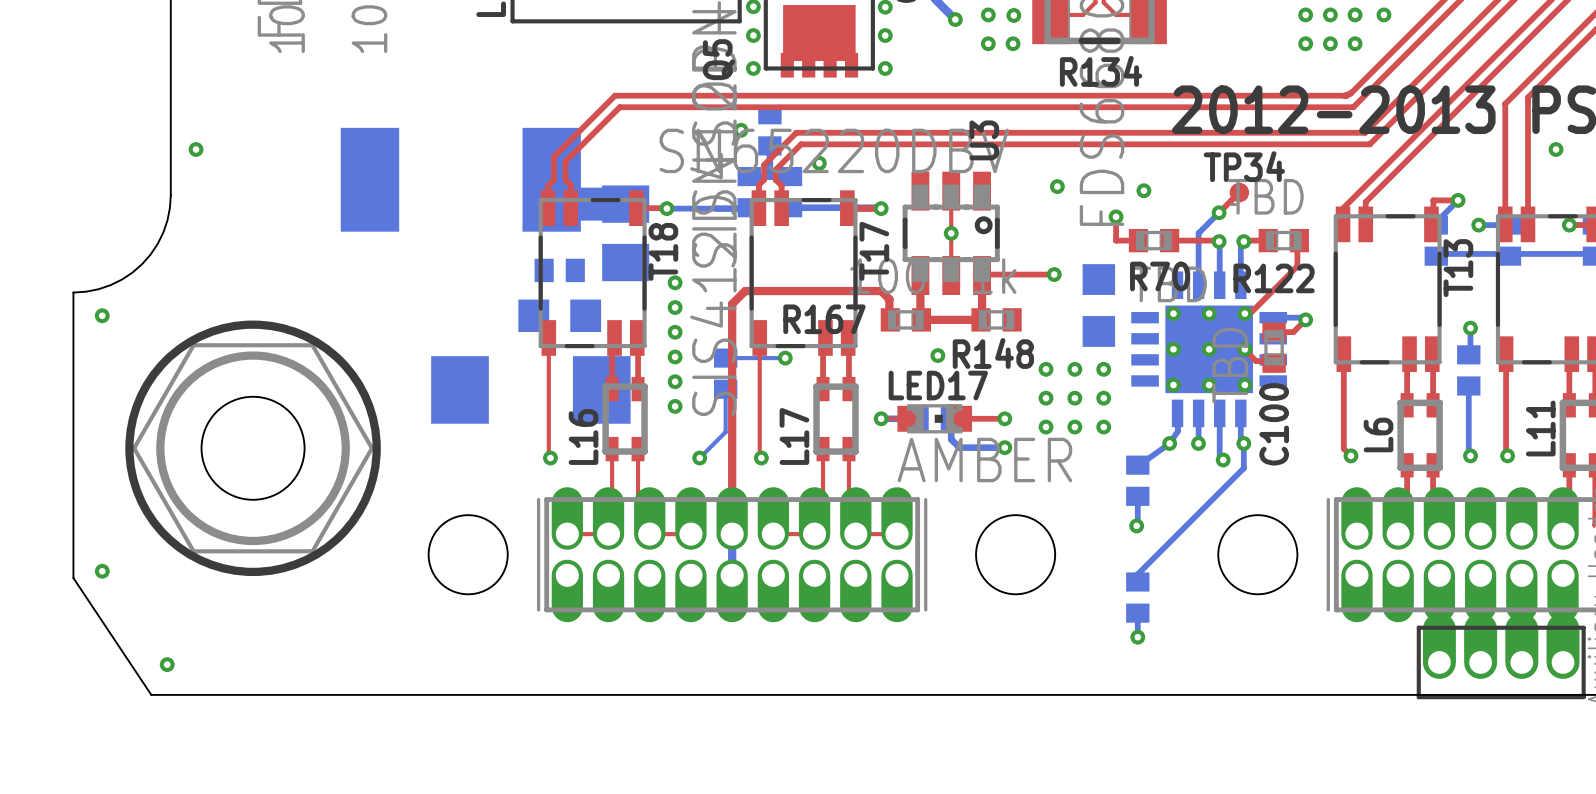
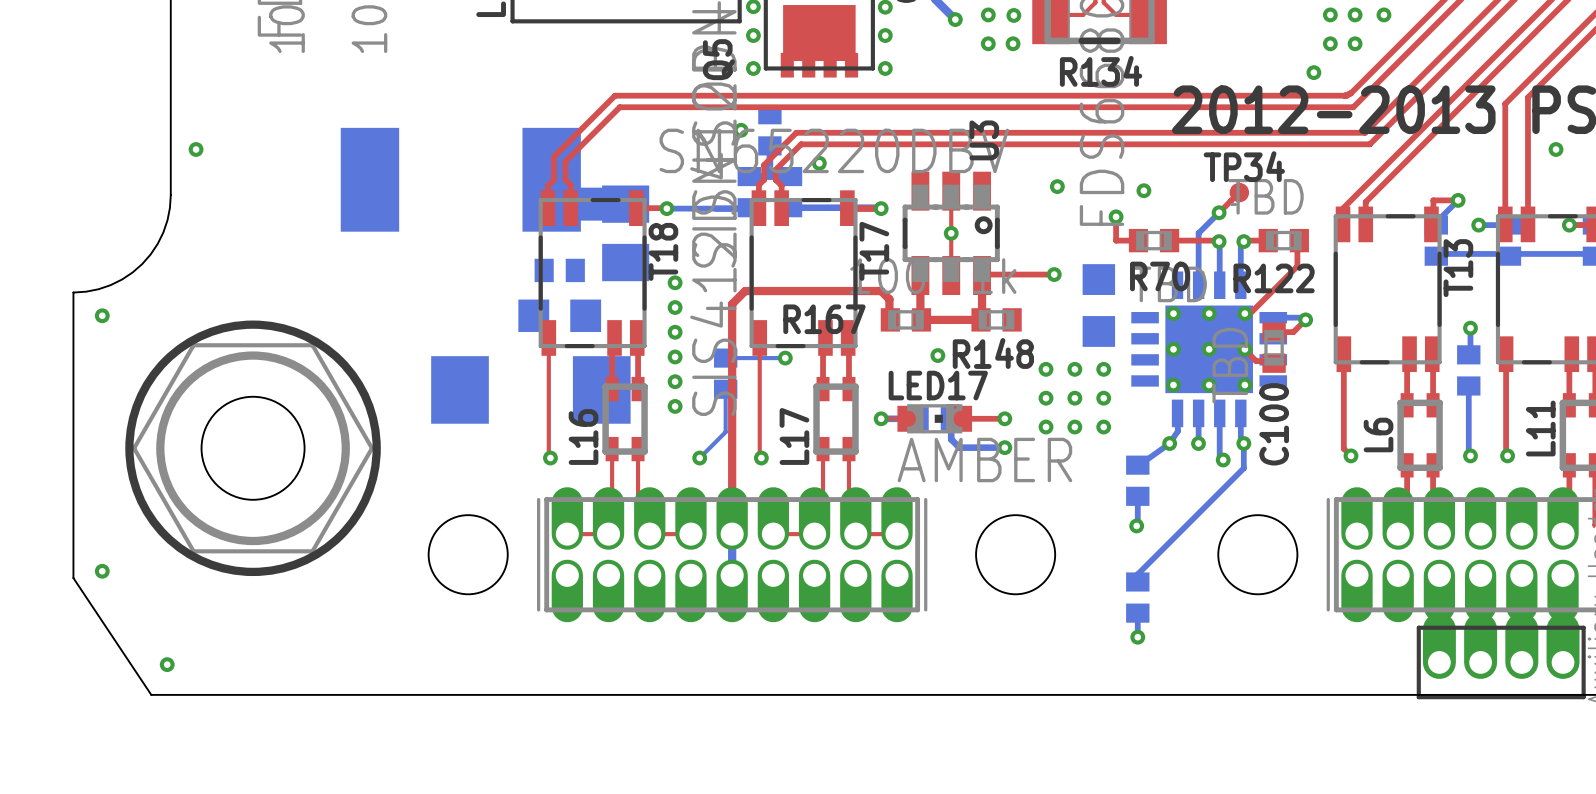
via: (1305, 14) -> none
via: (1305, 43) -> none
via: none -> (1313, 72)

